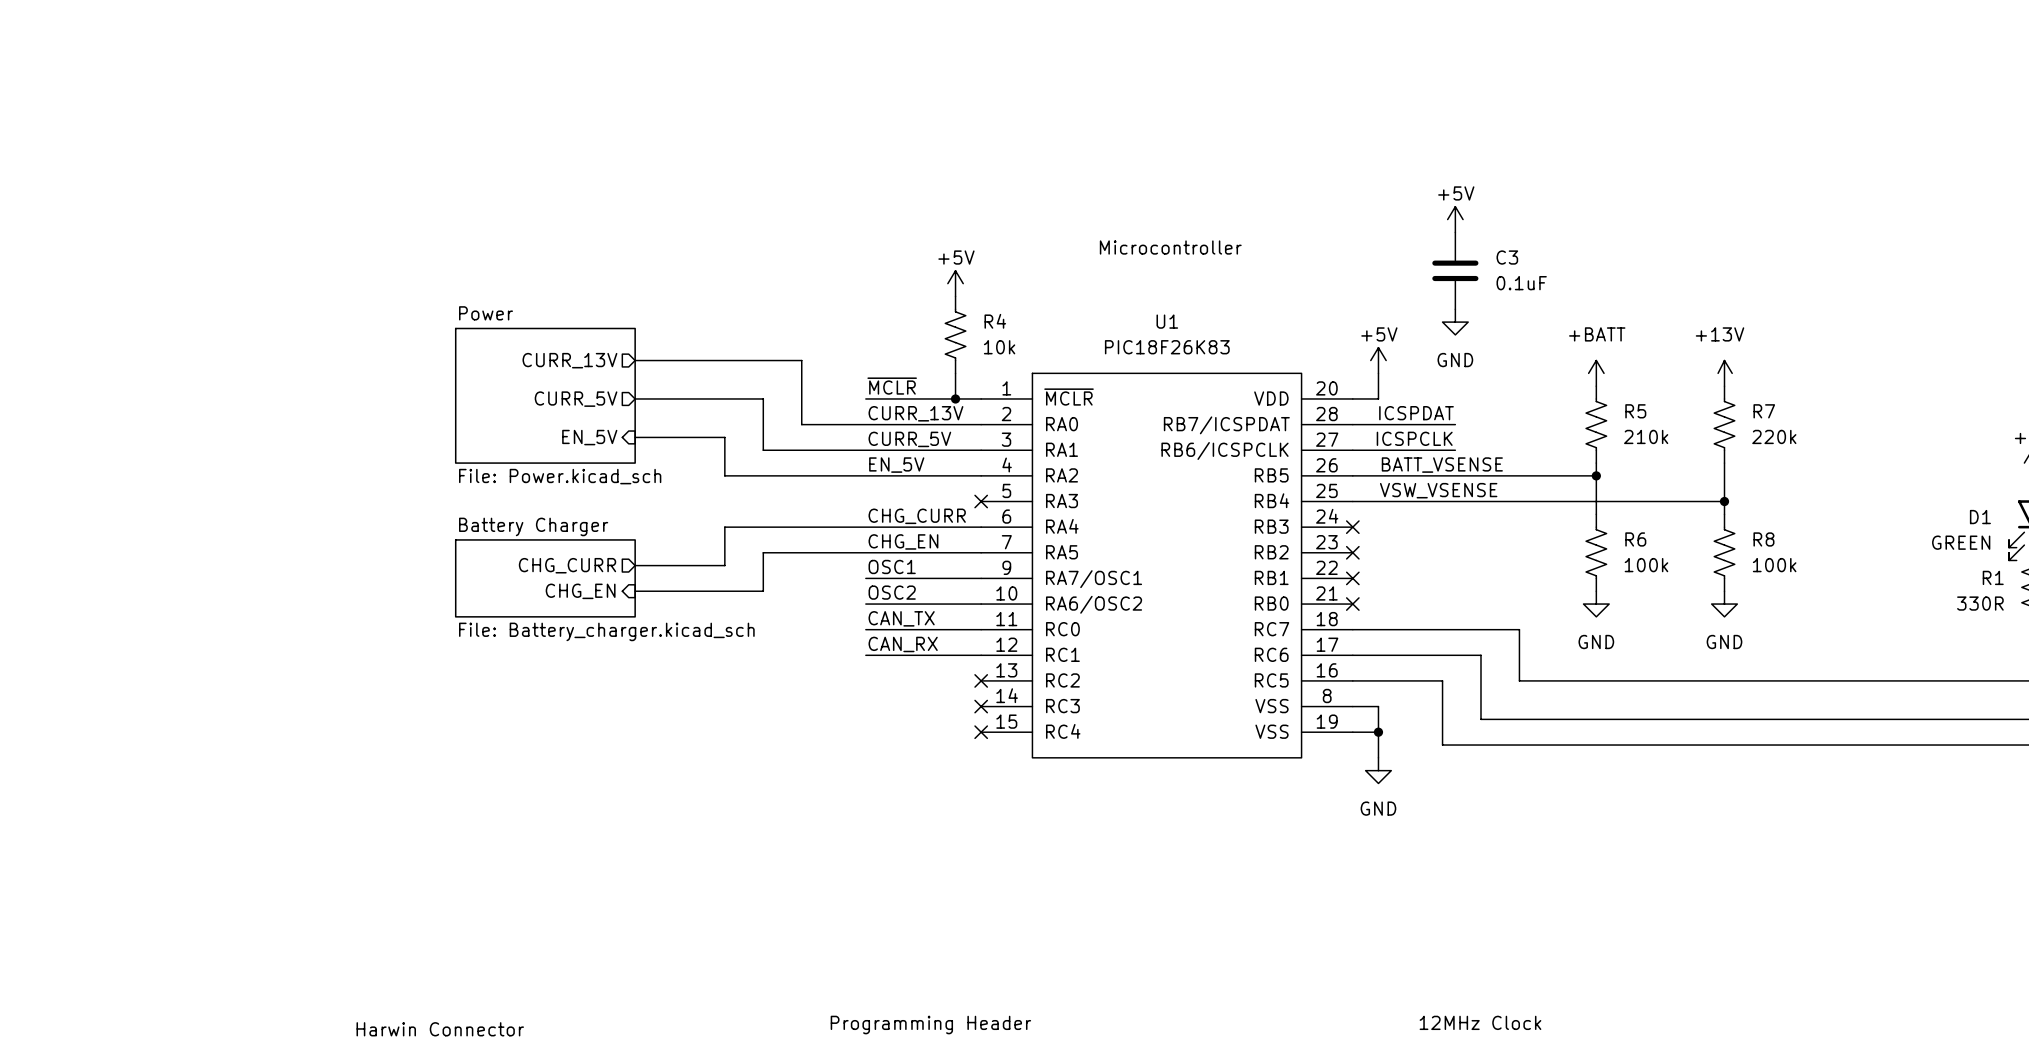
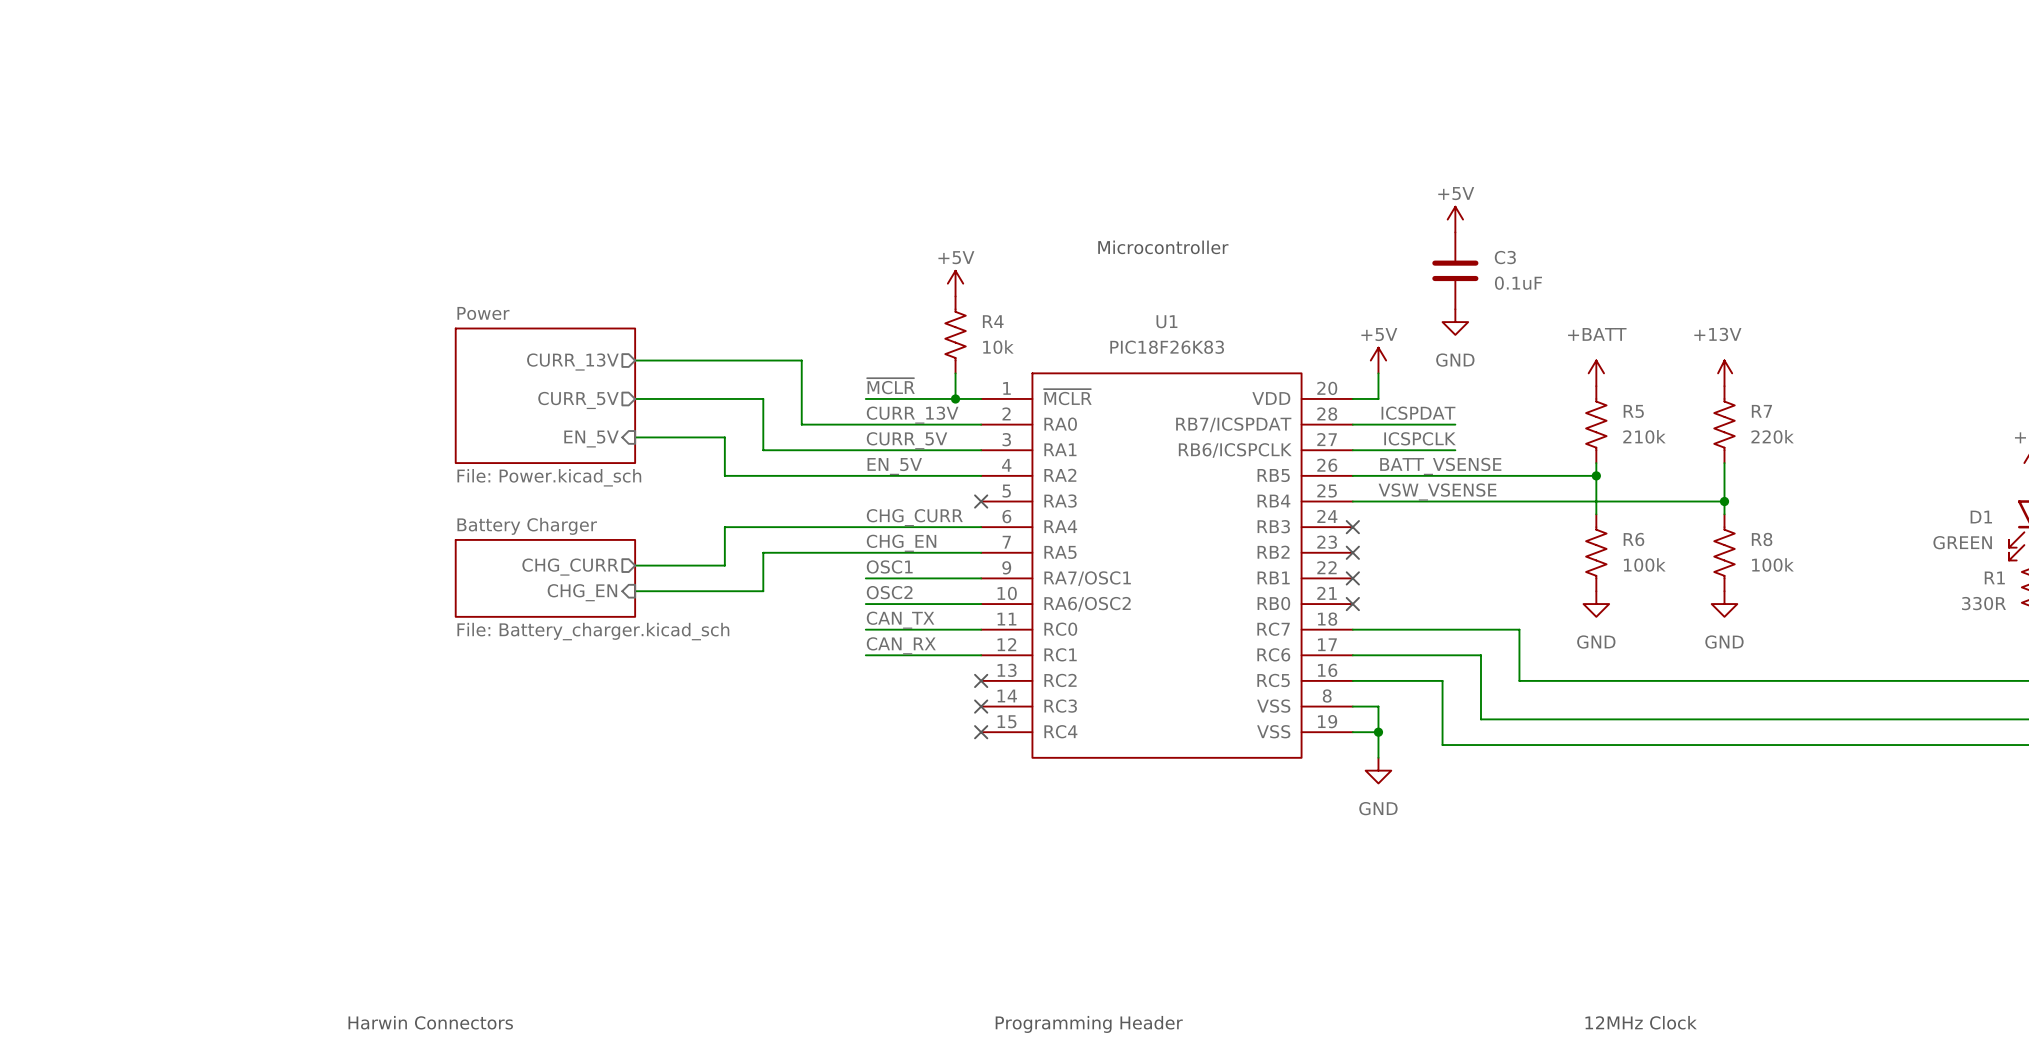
text position: 12MHz Clock (1480, 1022) -> 12MHz Clock (1641, 1022)
text position: Programming Header (930, 1025) -> Programming Header (1089, 1024)
text: Harwin Connector (440, 1029) -> Harwin Connectors (430, 1022)

